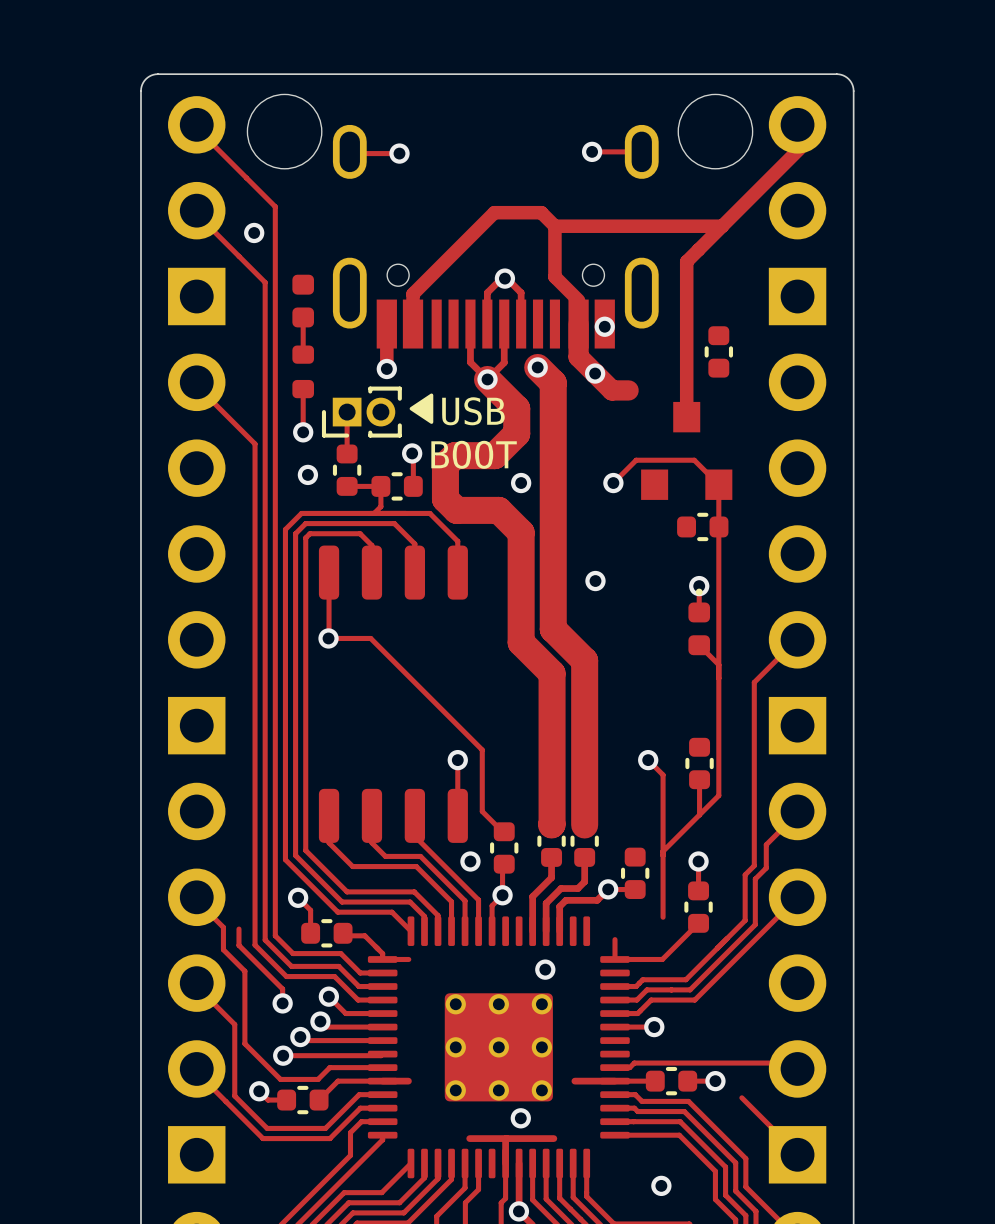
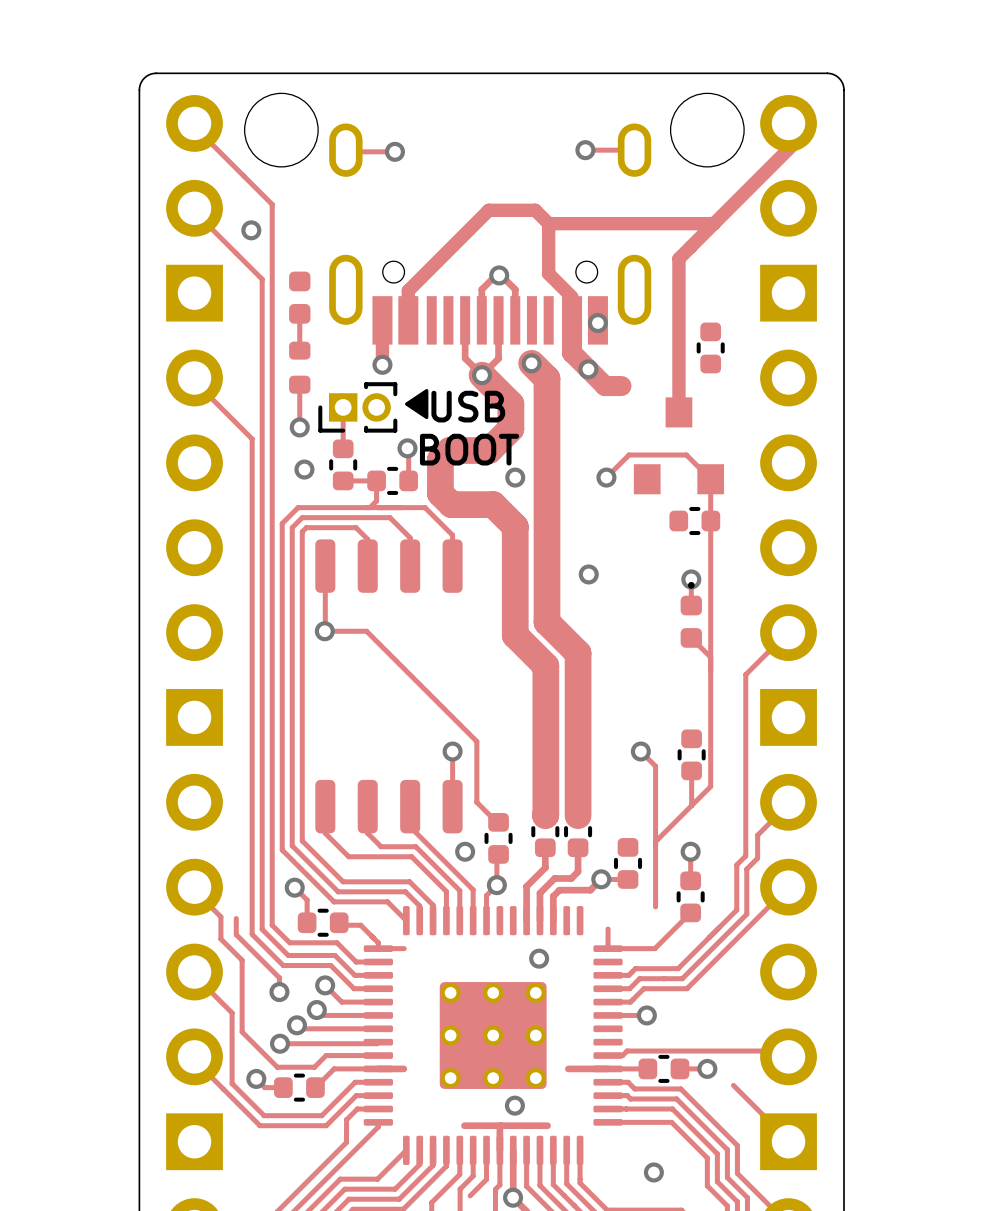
track: none -> (486, 1150) (486, 1179) (470, 1195)

